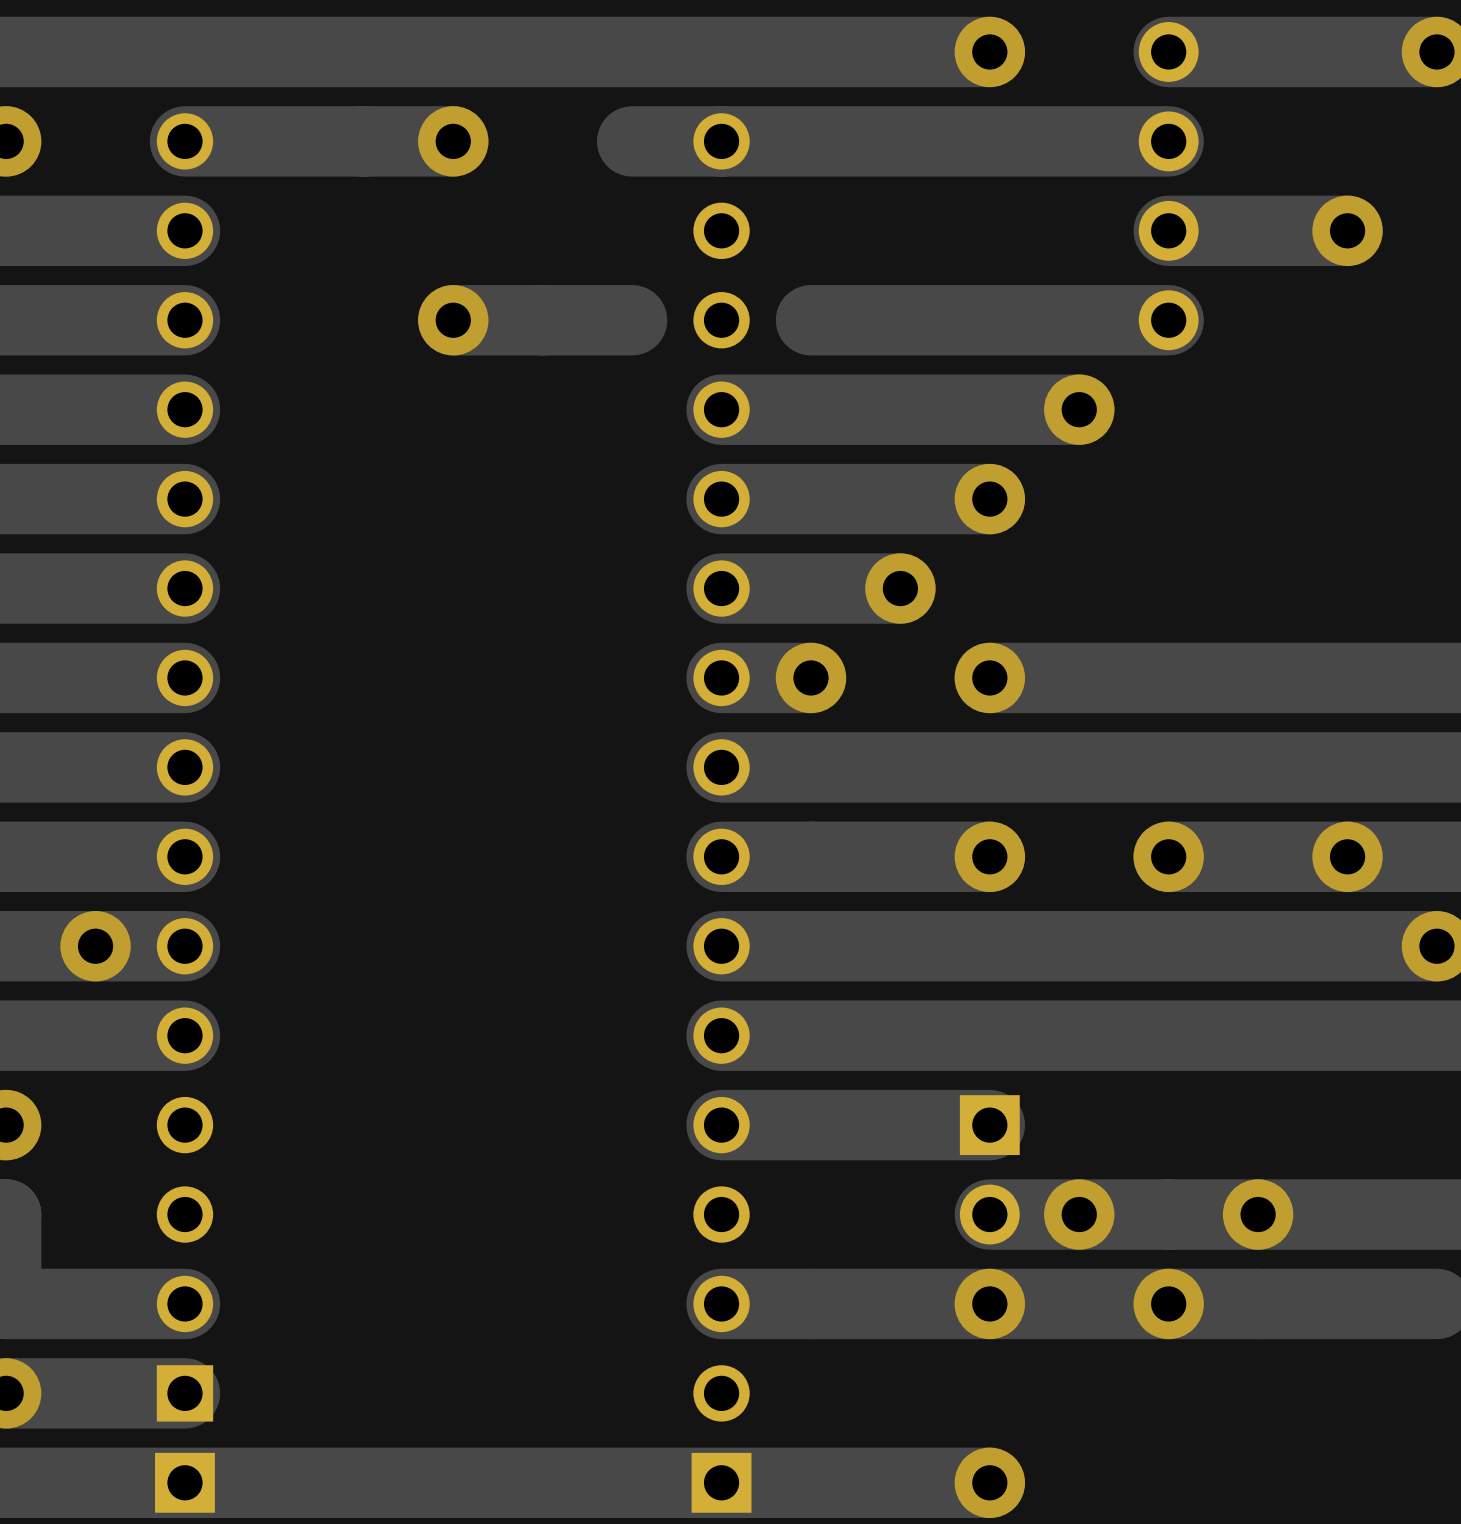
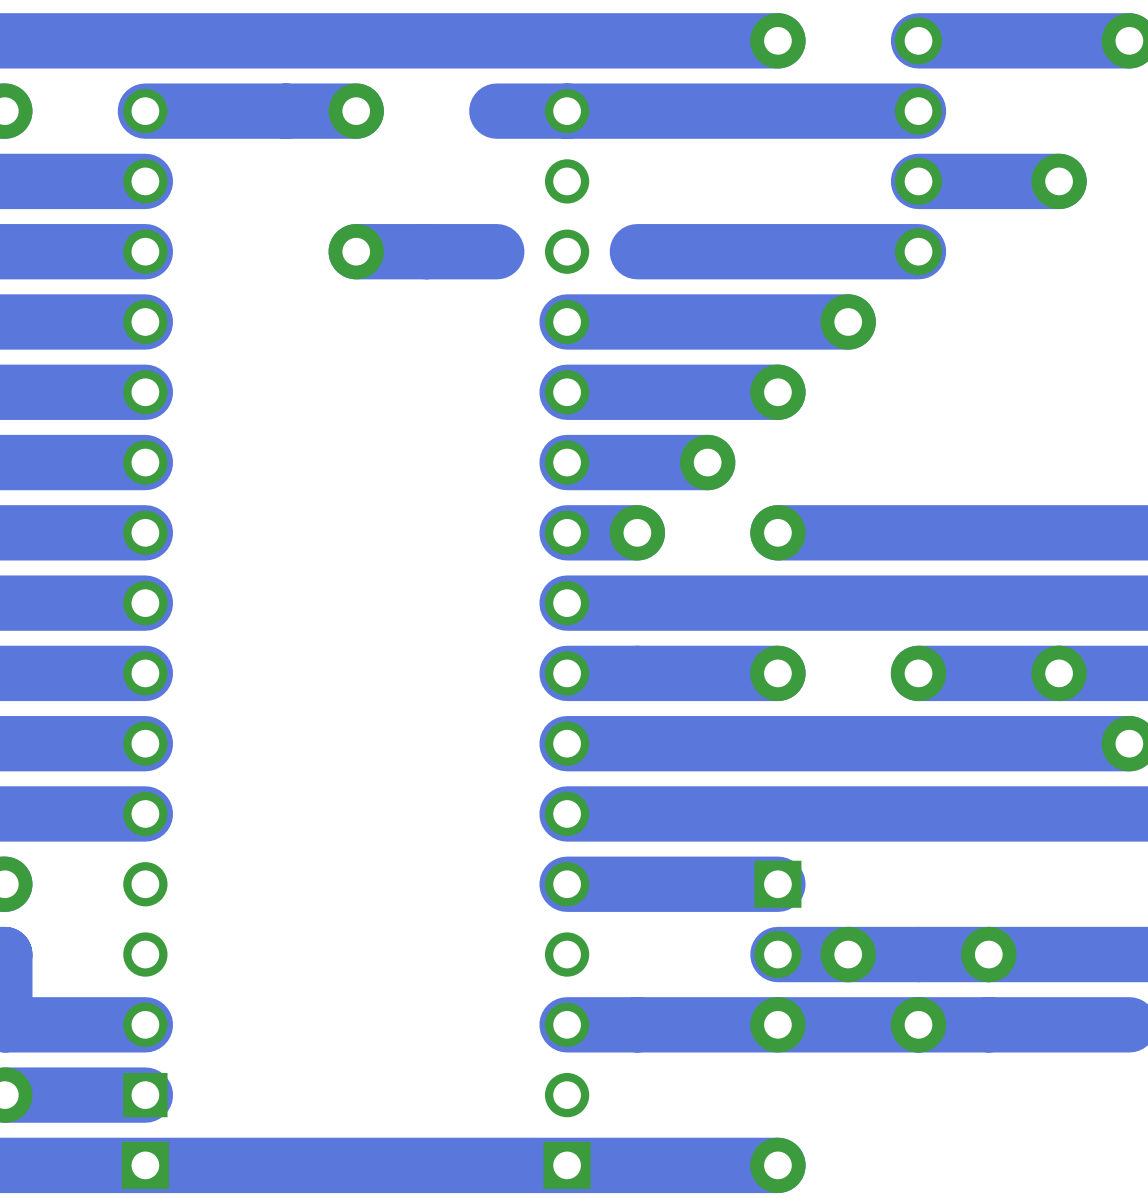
via: (95, 946) -> none

